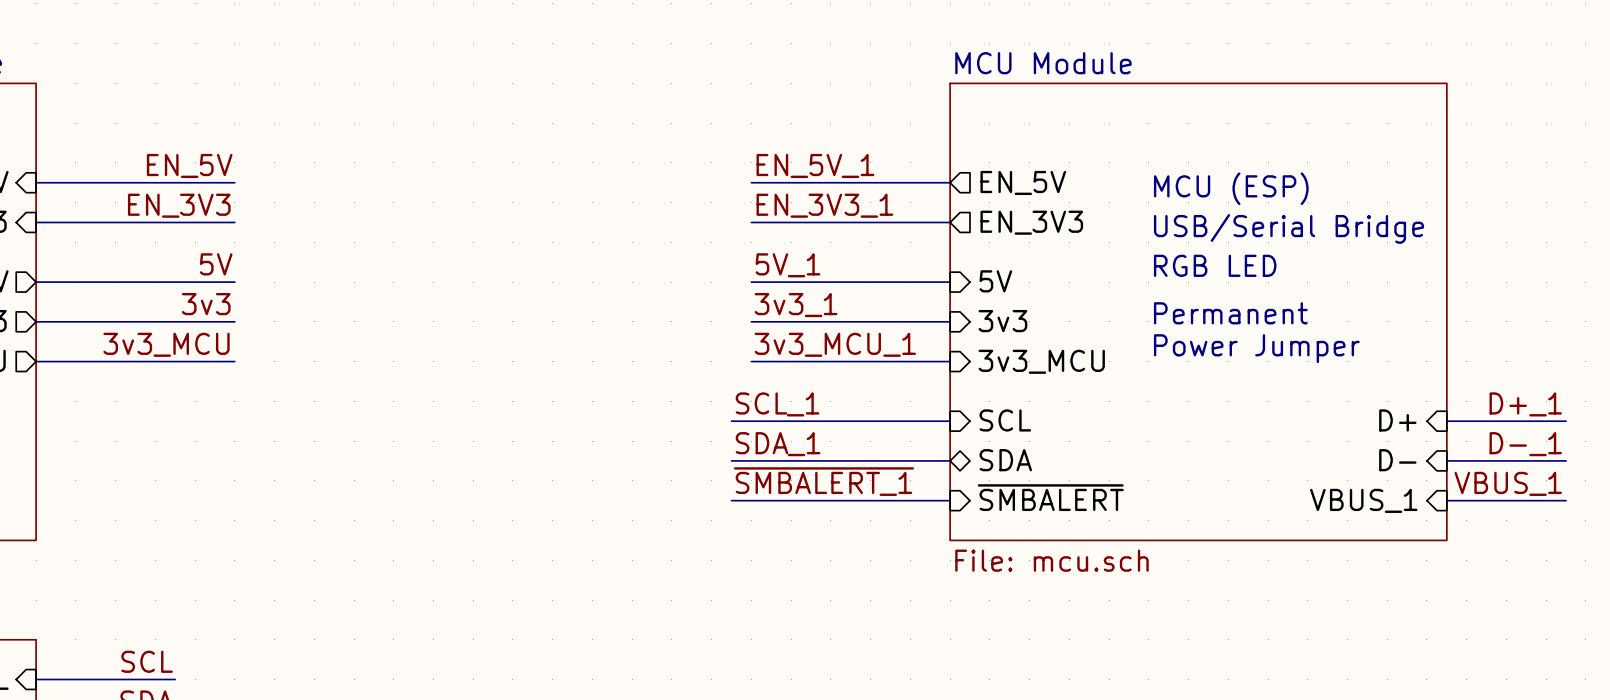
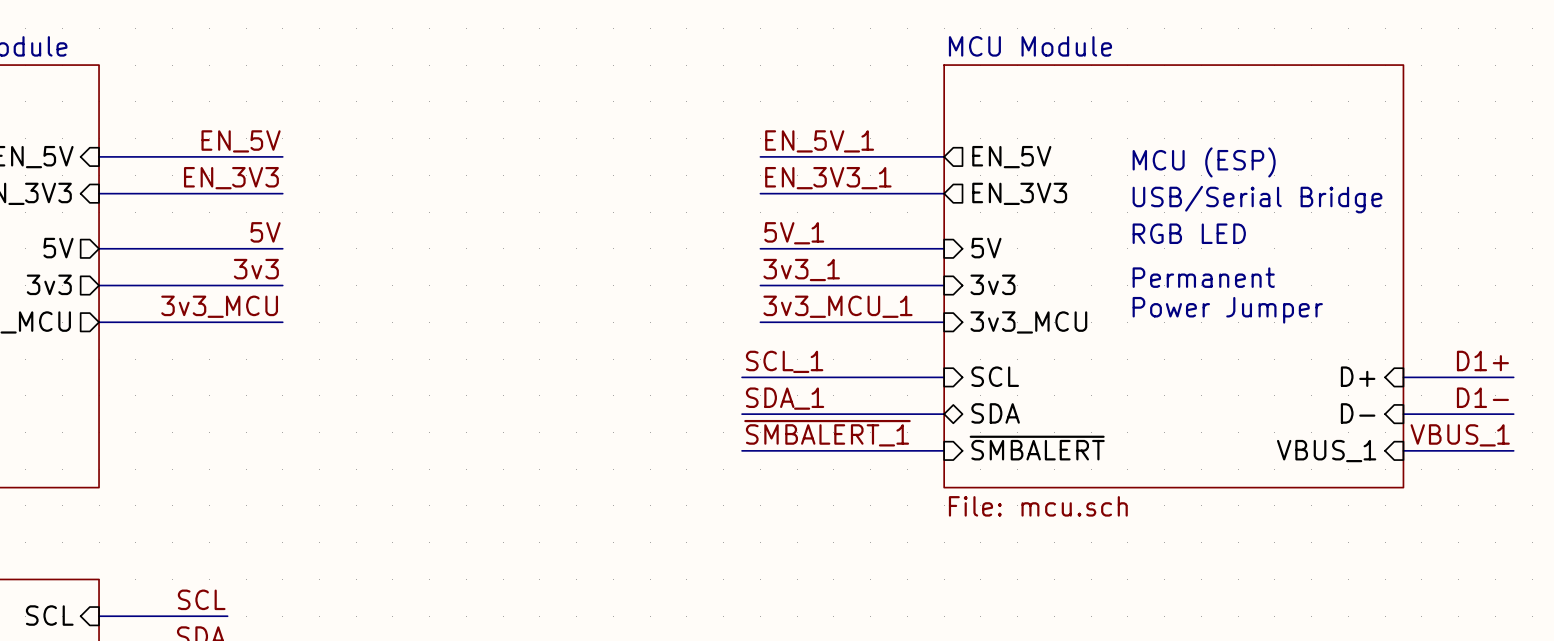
label: D+_1 (1525, 404) -> D1+ (1482, 360)
label: D-_1 (1525, 444) -> D1- (1482, 397)

